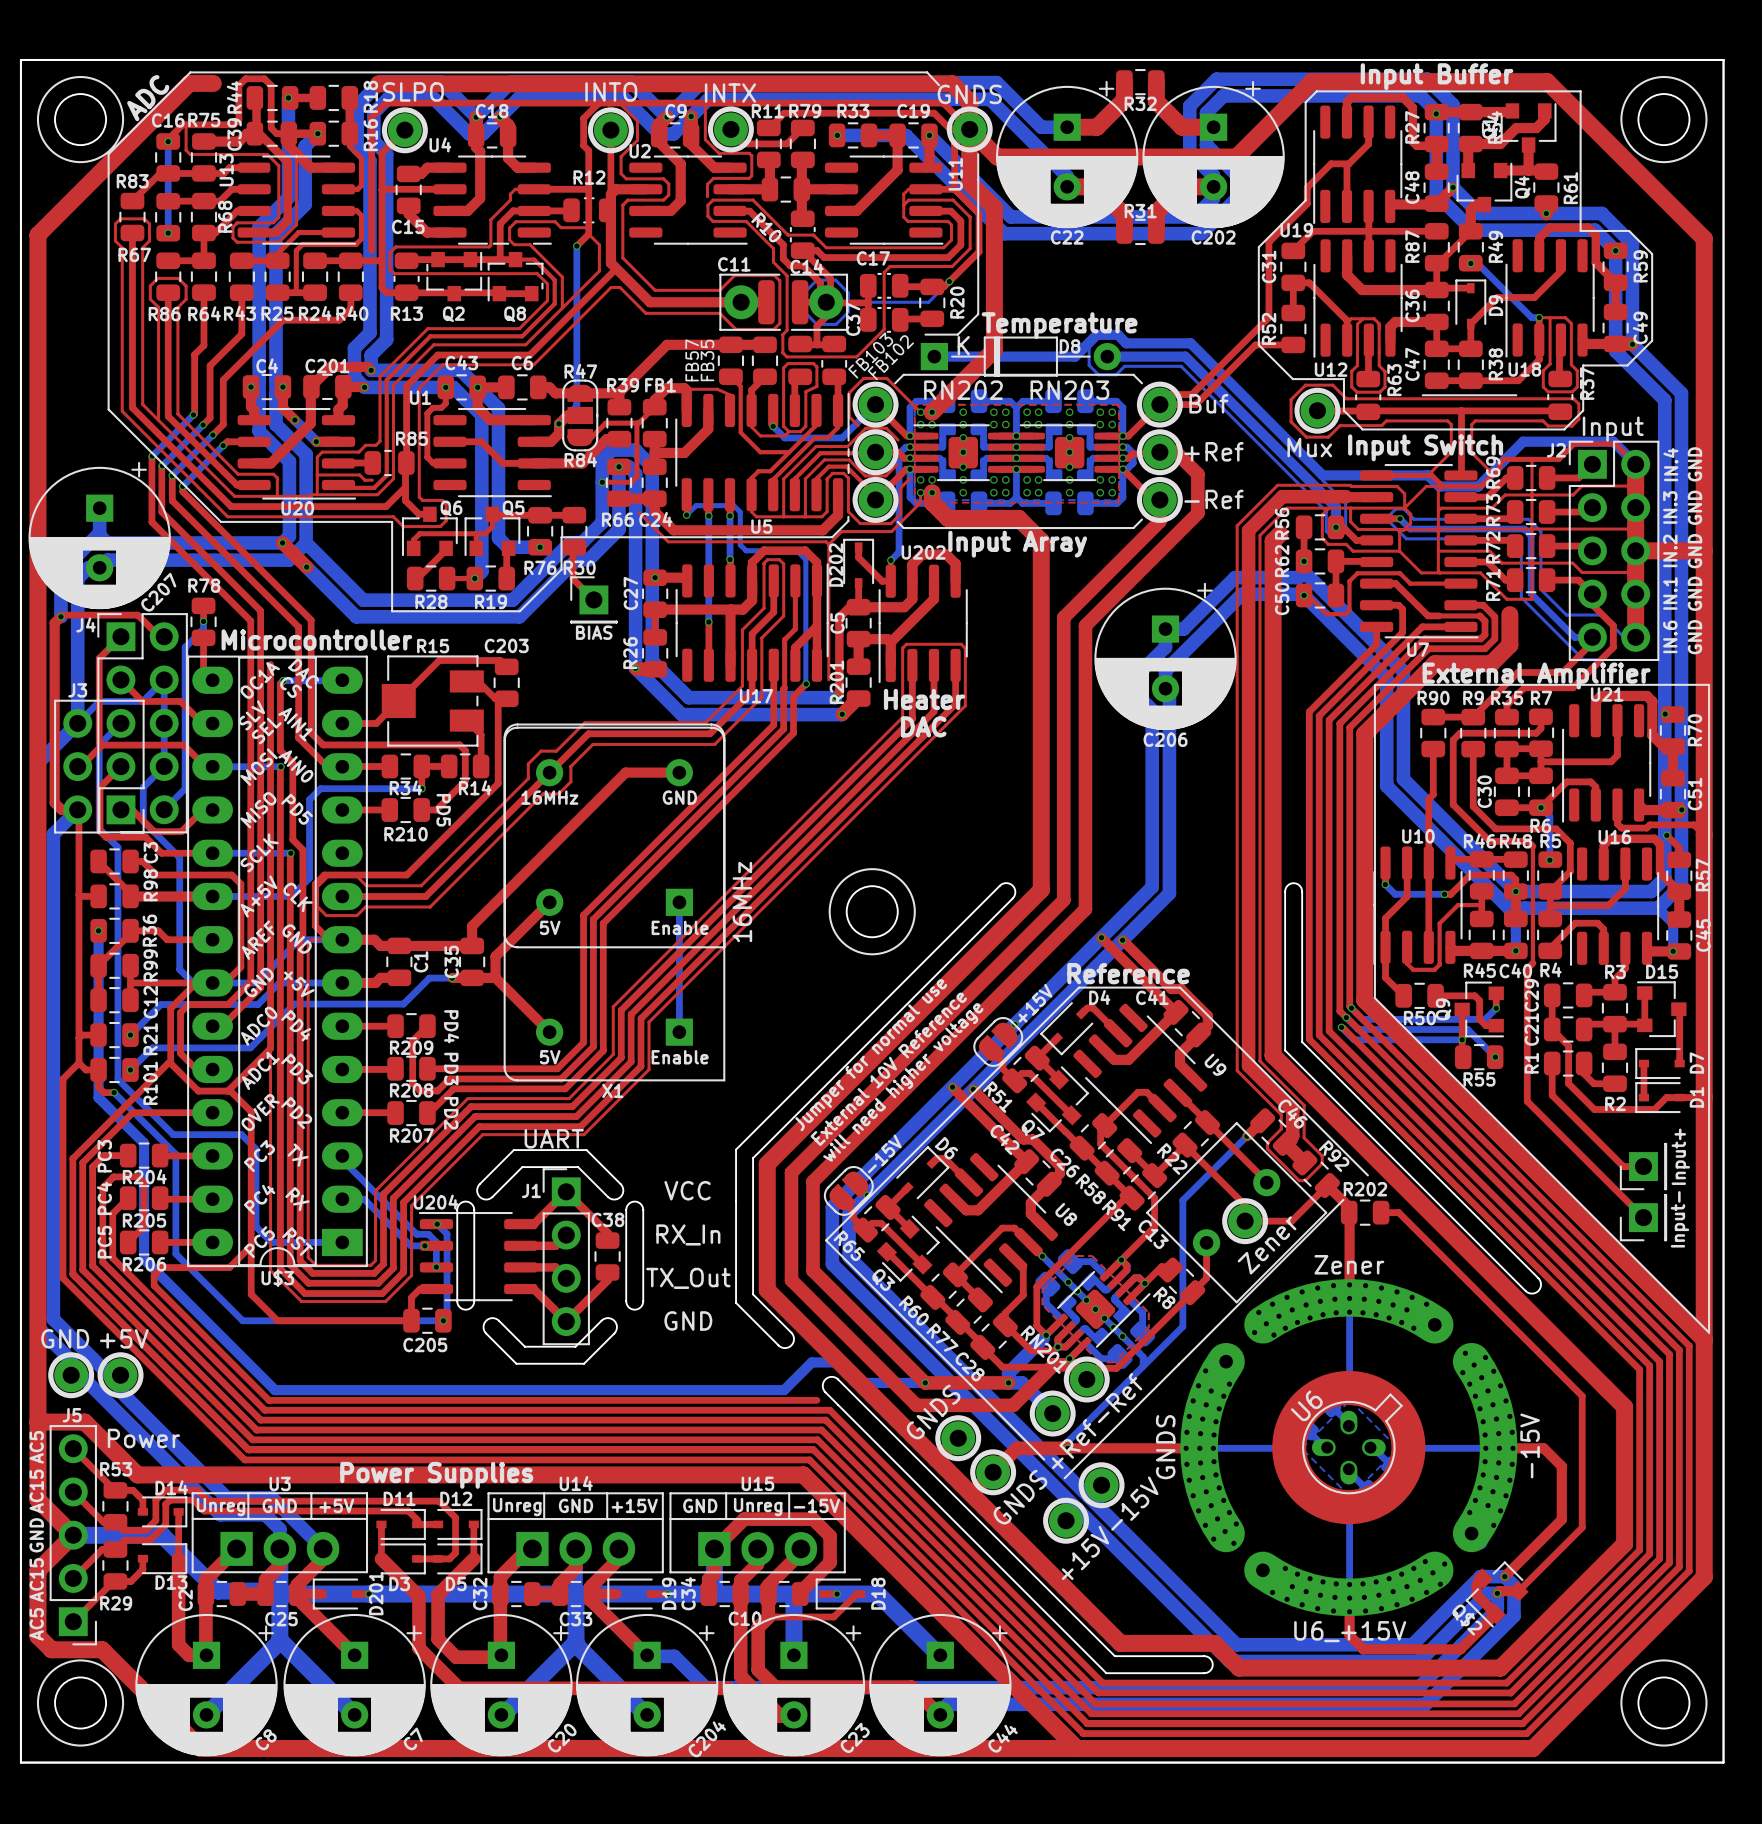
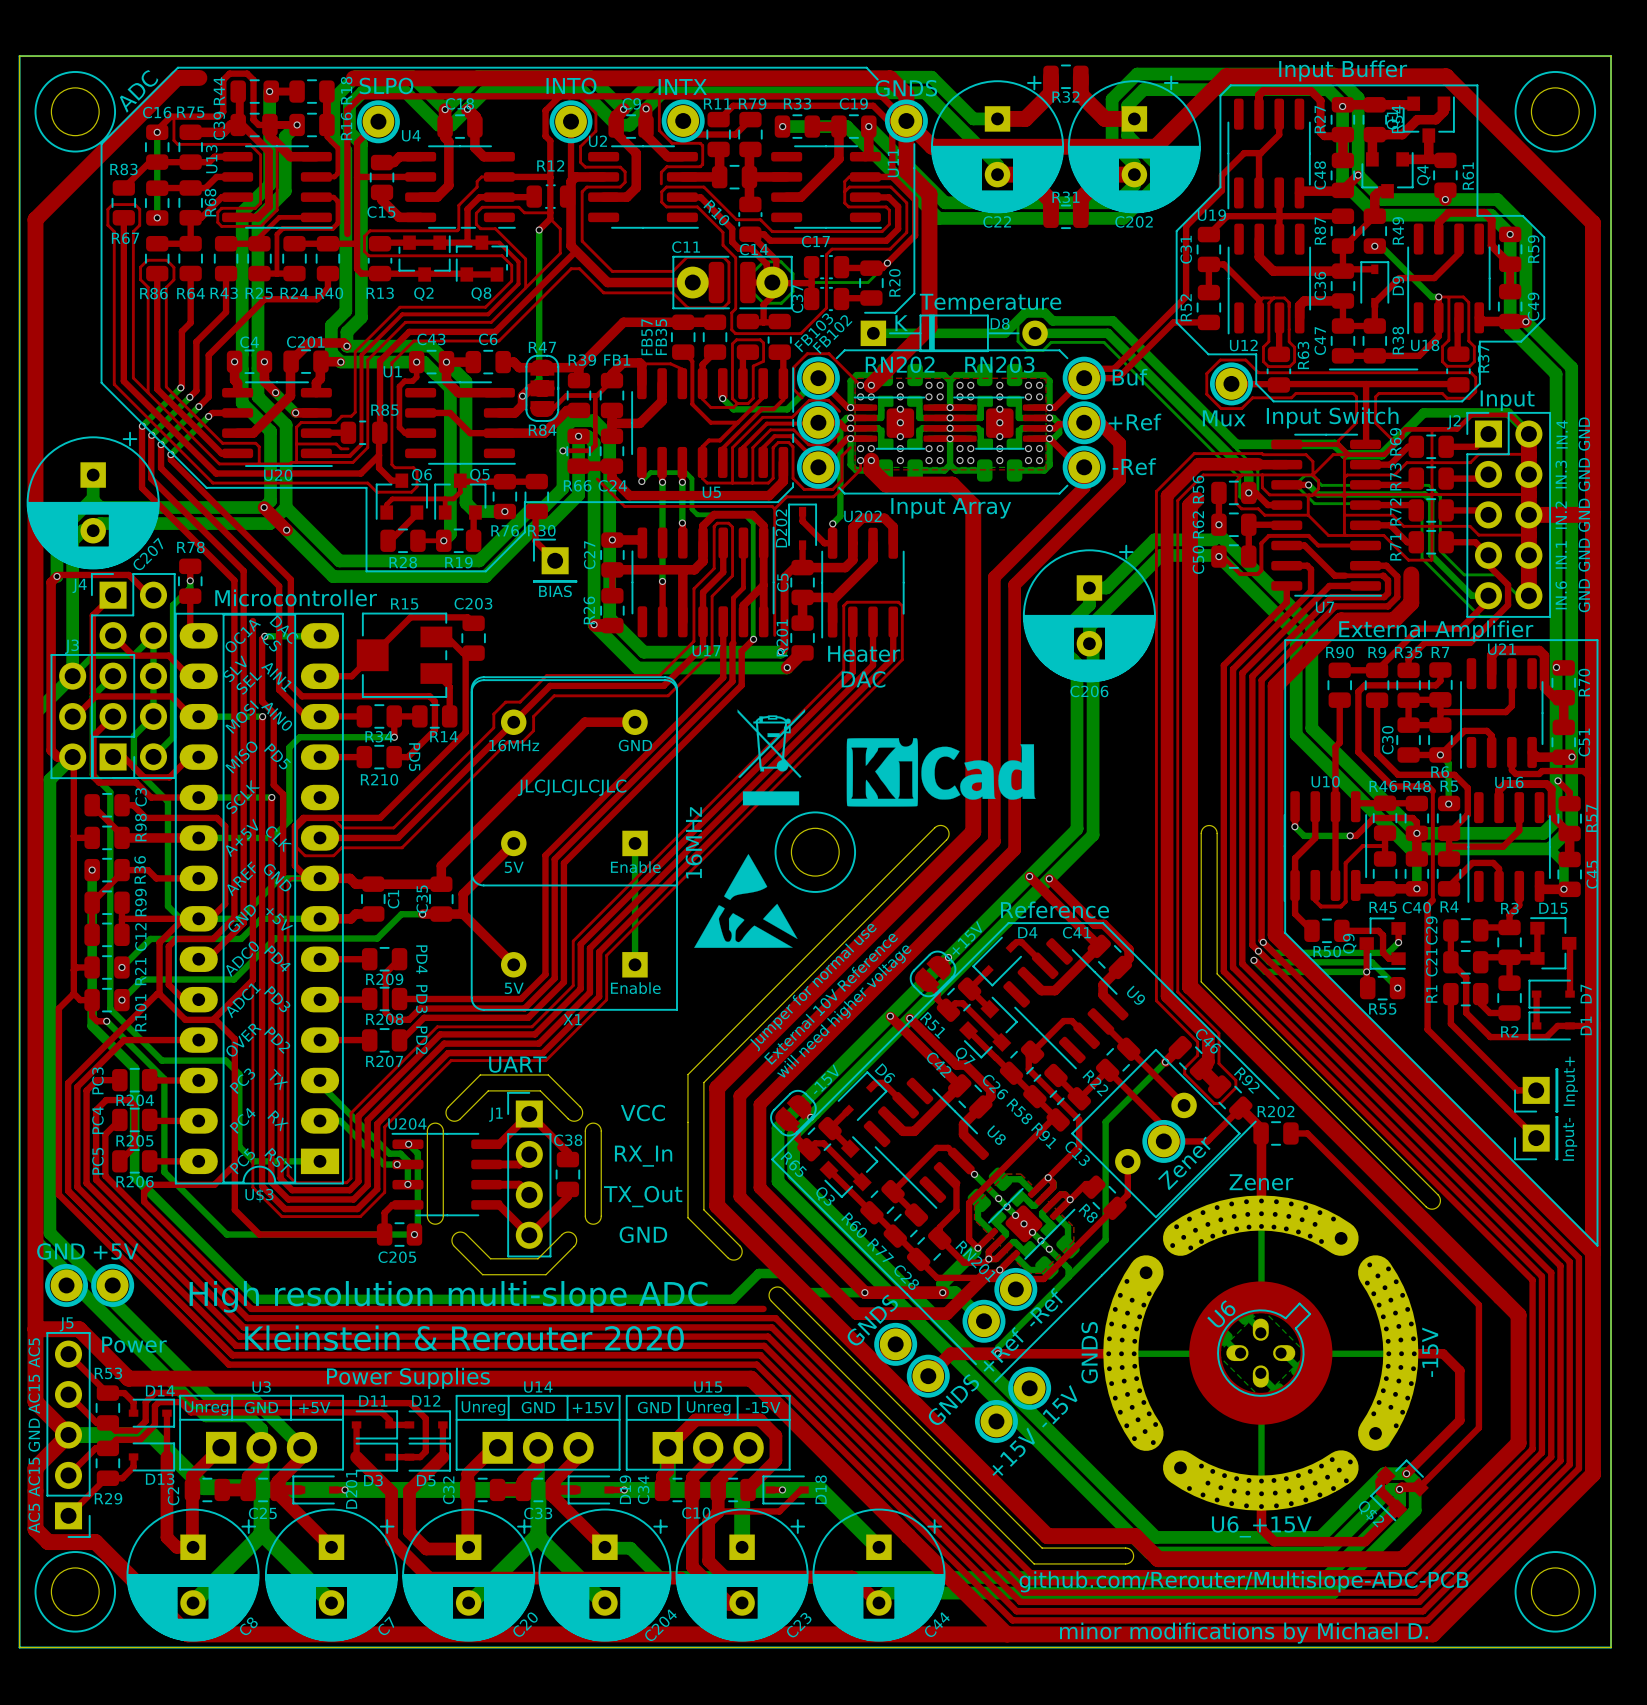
drawing: none -> [737, 709, 806, 806]
drawing: none -> [846, 738, 1036, 807]
text: none -> JLCJLCJLCJLC (572, 787)
drawing: none -> [694, 854, 798, 948]
text: none -> High resolution multi-slope ADC (448, 1296)
text: none -> Kleinstein & Rerouter 2020 (464, 1338)
text: none -> github.com/Rerouter/Multislope-ADC-PCB (1243, 1581)
text: none -> minor modifications by Michael D. (1243, 1633)

